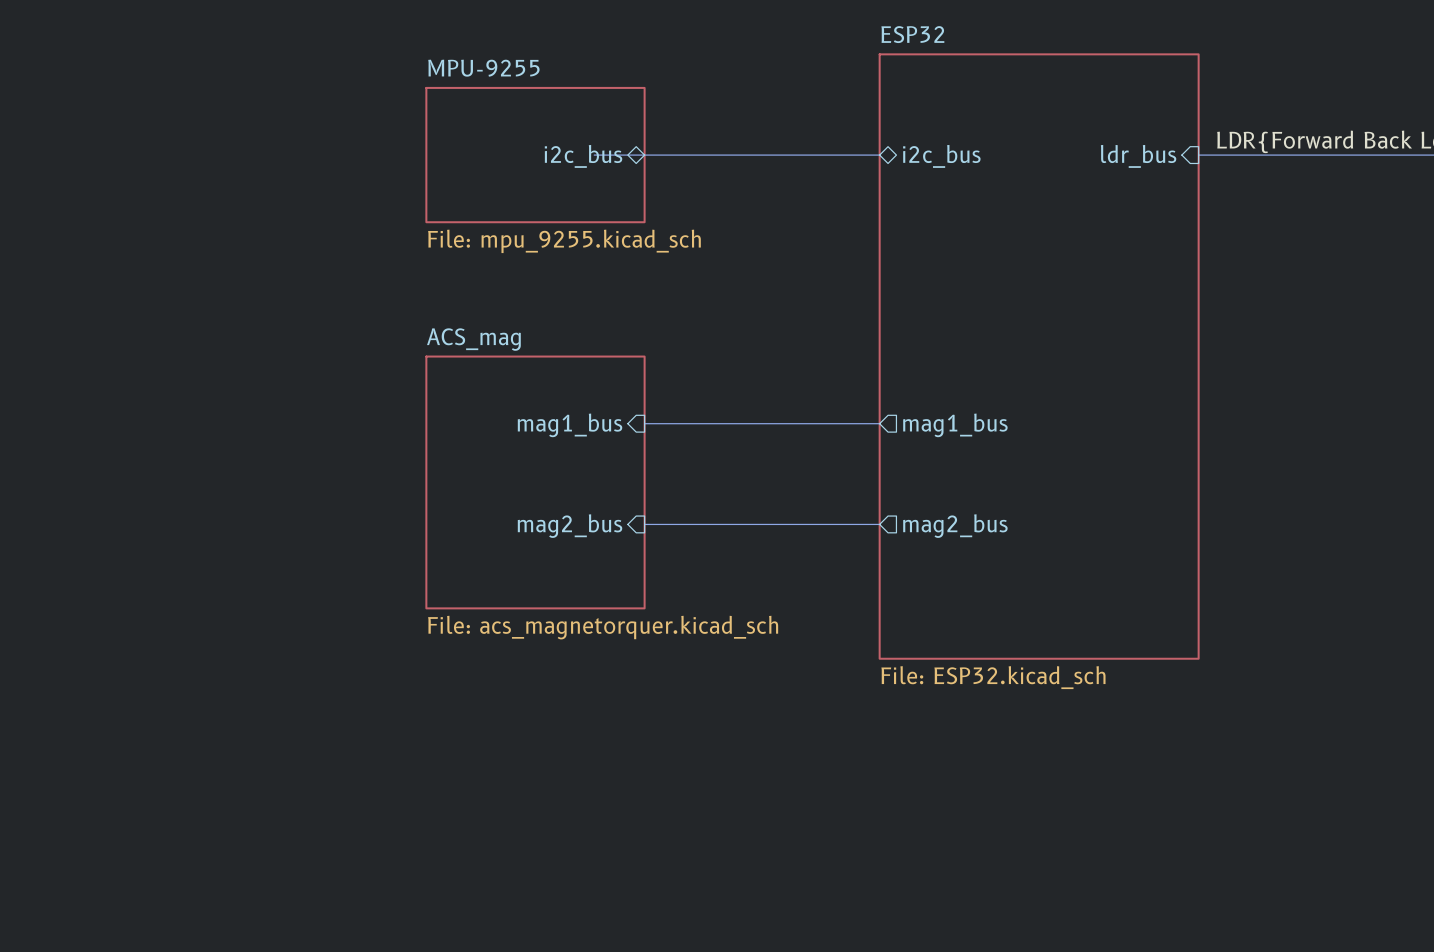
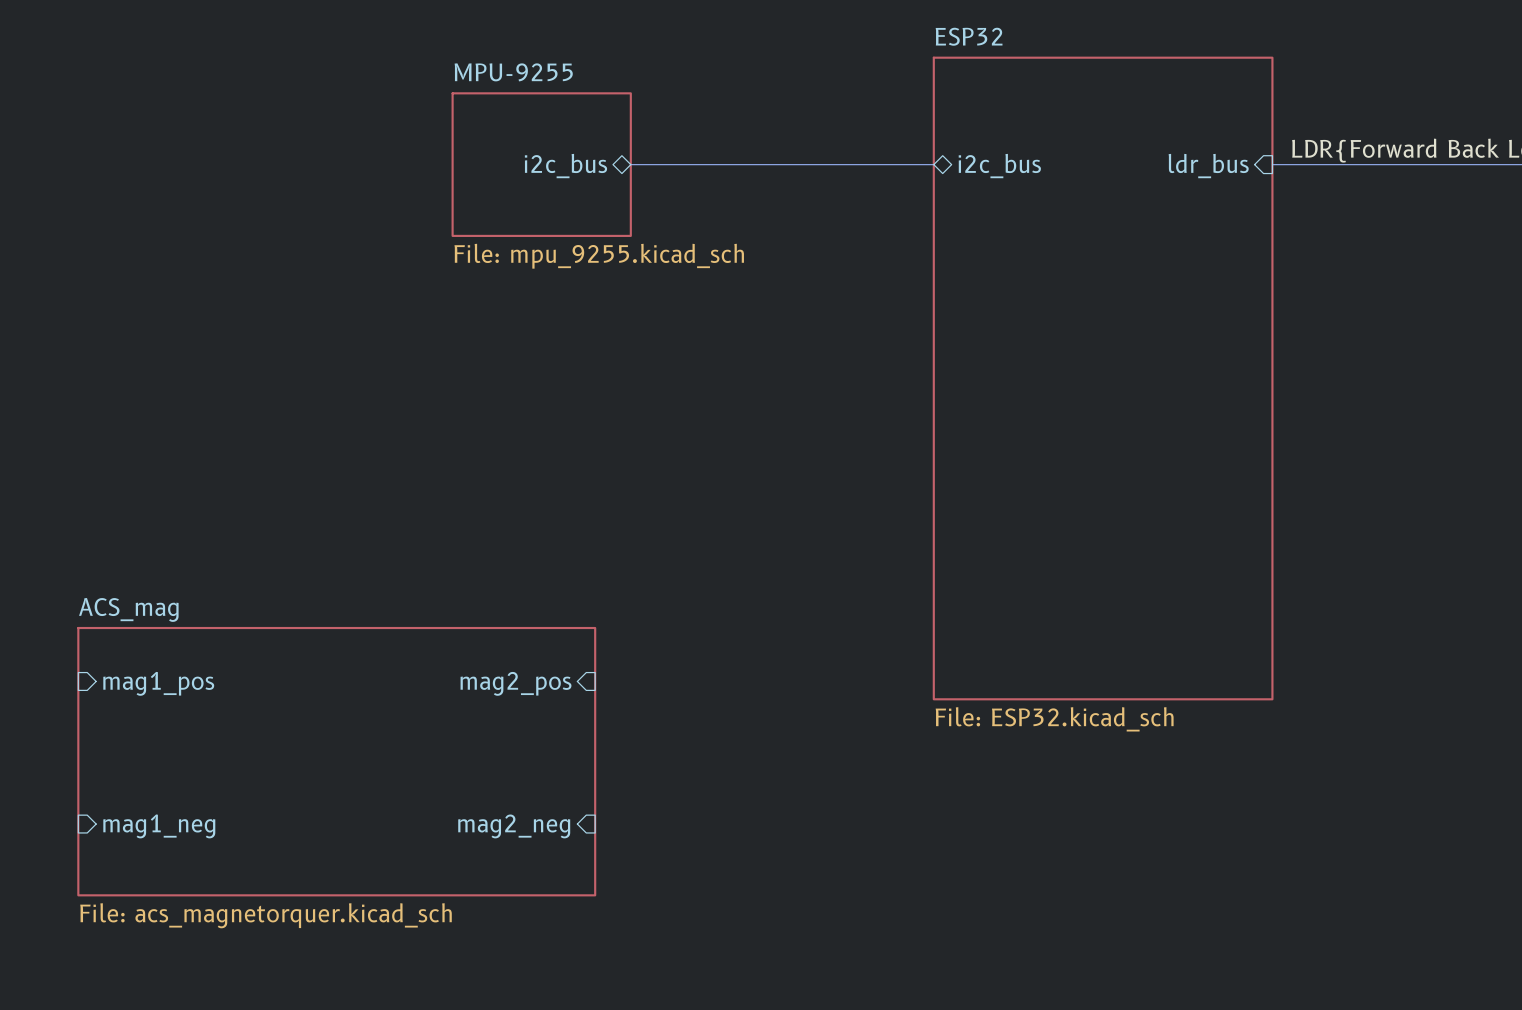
sheet MPU-9255 shape: [425, 86, 646, 224] -> [451, 92, 632, 237]
sheet pin position: i2c_bus (583, 156) -> i2c_bus (565, 166)
bus: (644, 423) (879, 423) -> none
sheet pin: mag1_bus (570, 425) -> none
sheet pin: mag1_bus (955, 425) -> none
sheet ACS_mag: File: acs_magnetorquer.kicad_sch (535, 482) -> none
bus: (644, 524) (879, 524) -> none
sheet pin: mag2_bus (570, 526) -> none
sheet pin: mag2_bus (955, 526) -> none
sheet pin: none -> mag1_pos (158, 683)
sheet pin: none -> mag2_pos (516, 683)
sheet ACS_mag: none -> File: acs_magnetorquer.kicad_sch (336, 761)
sheet pin: none -> mag1_neg (159, 826)
sheet pin: none -> mag2_neg (514, 826)

